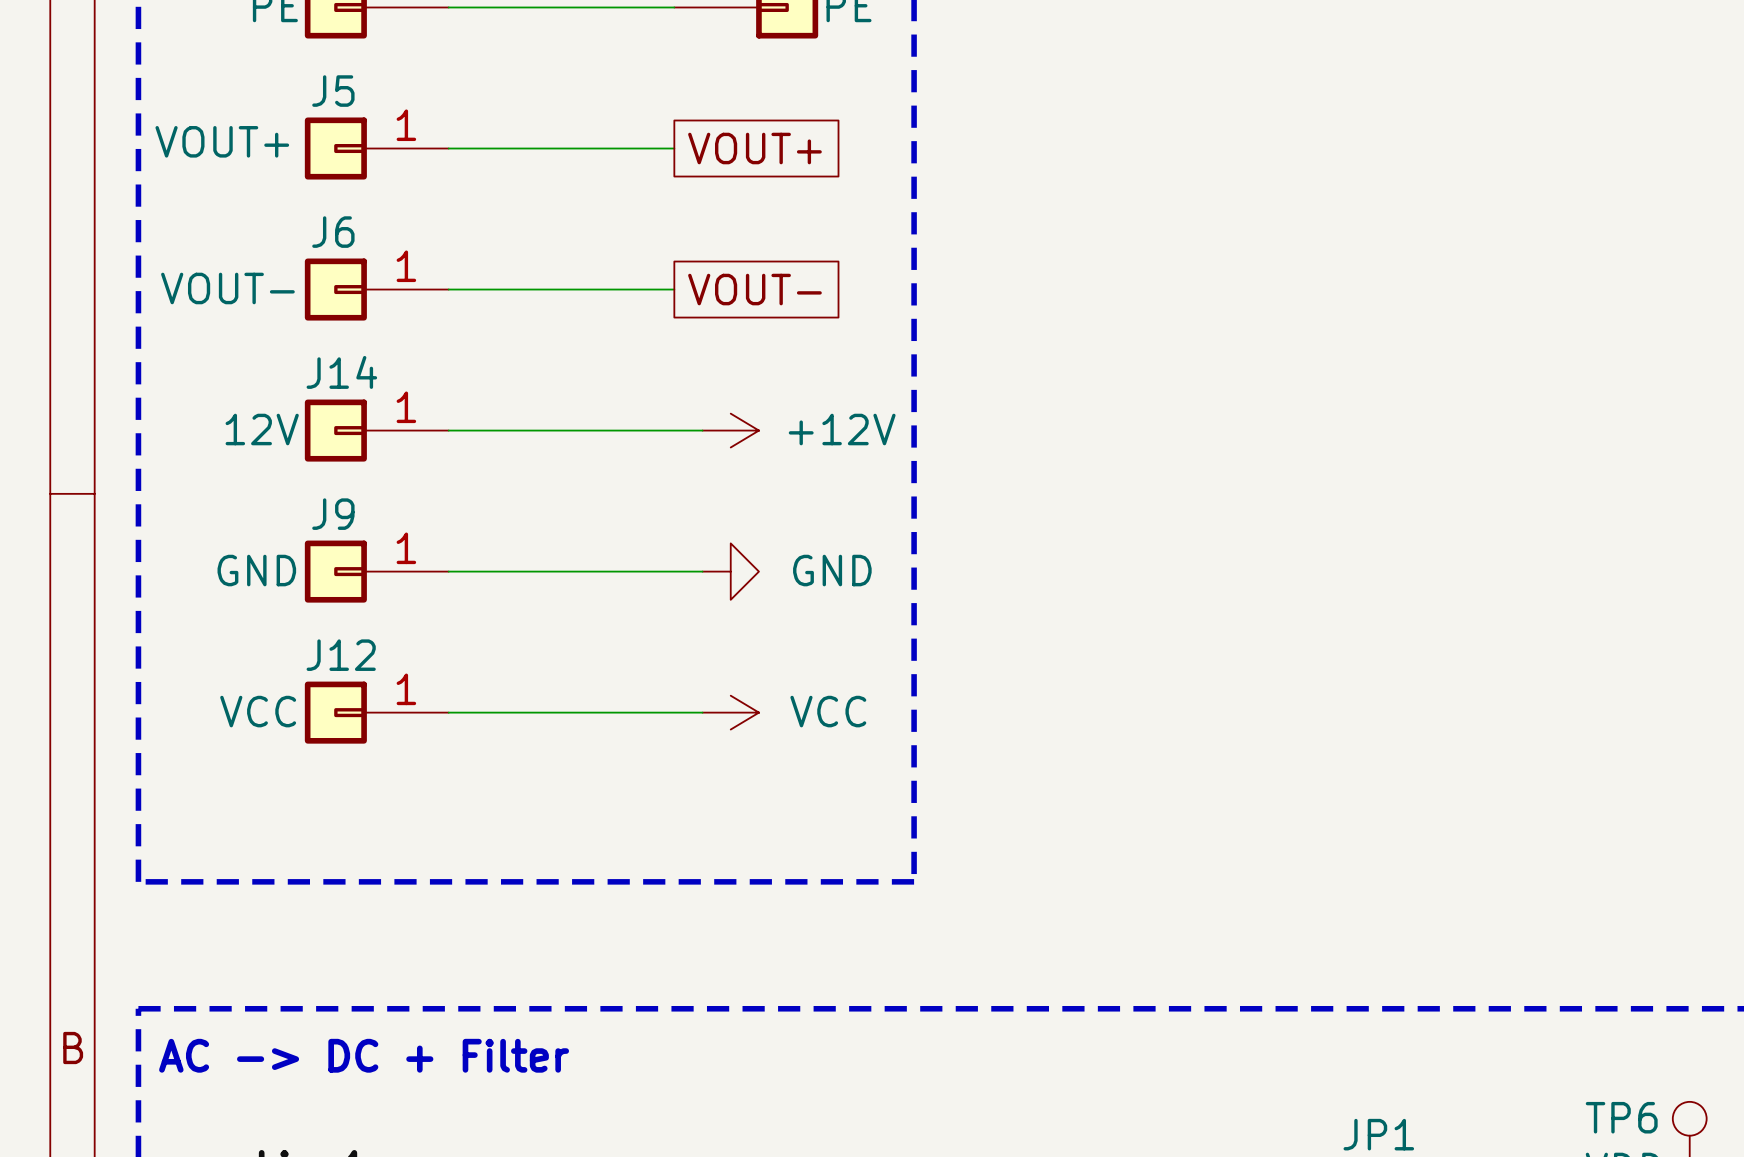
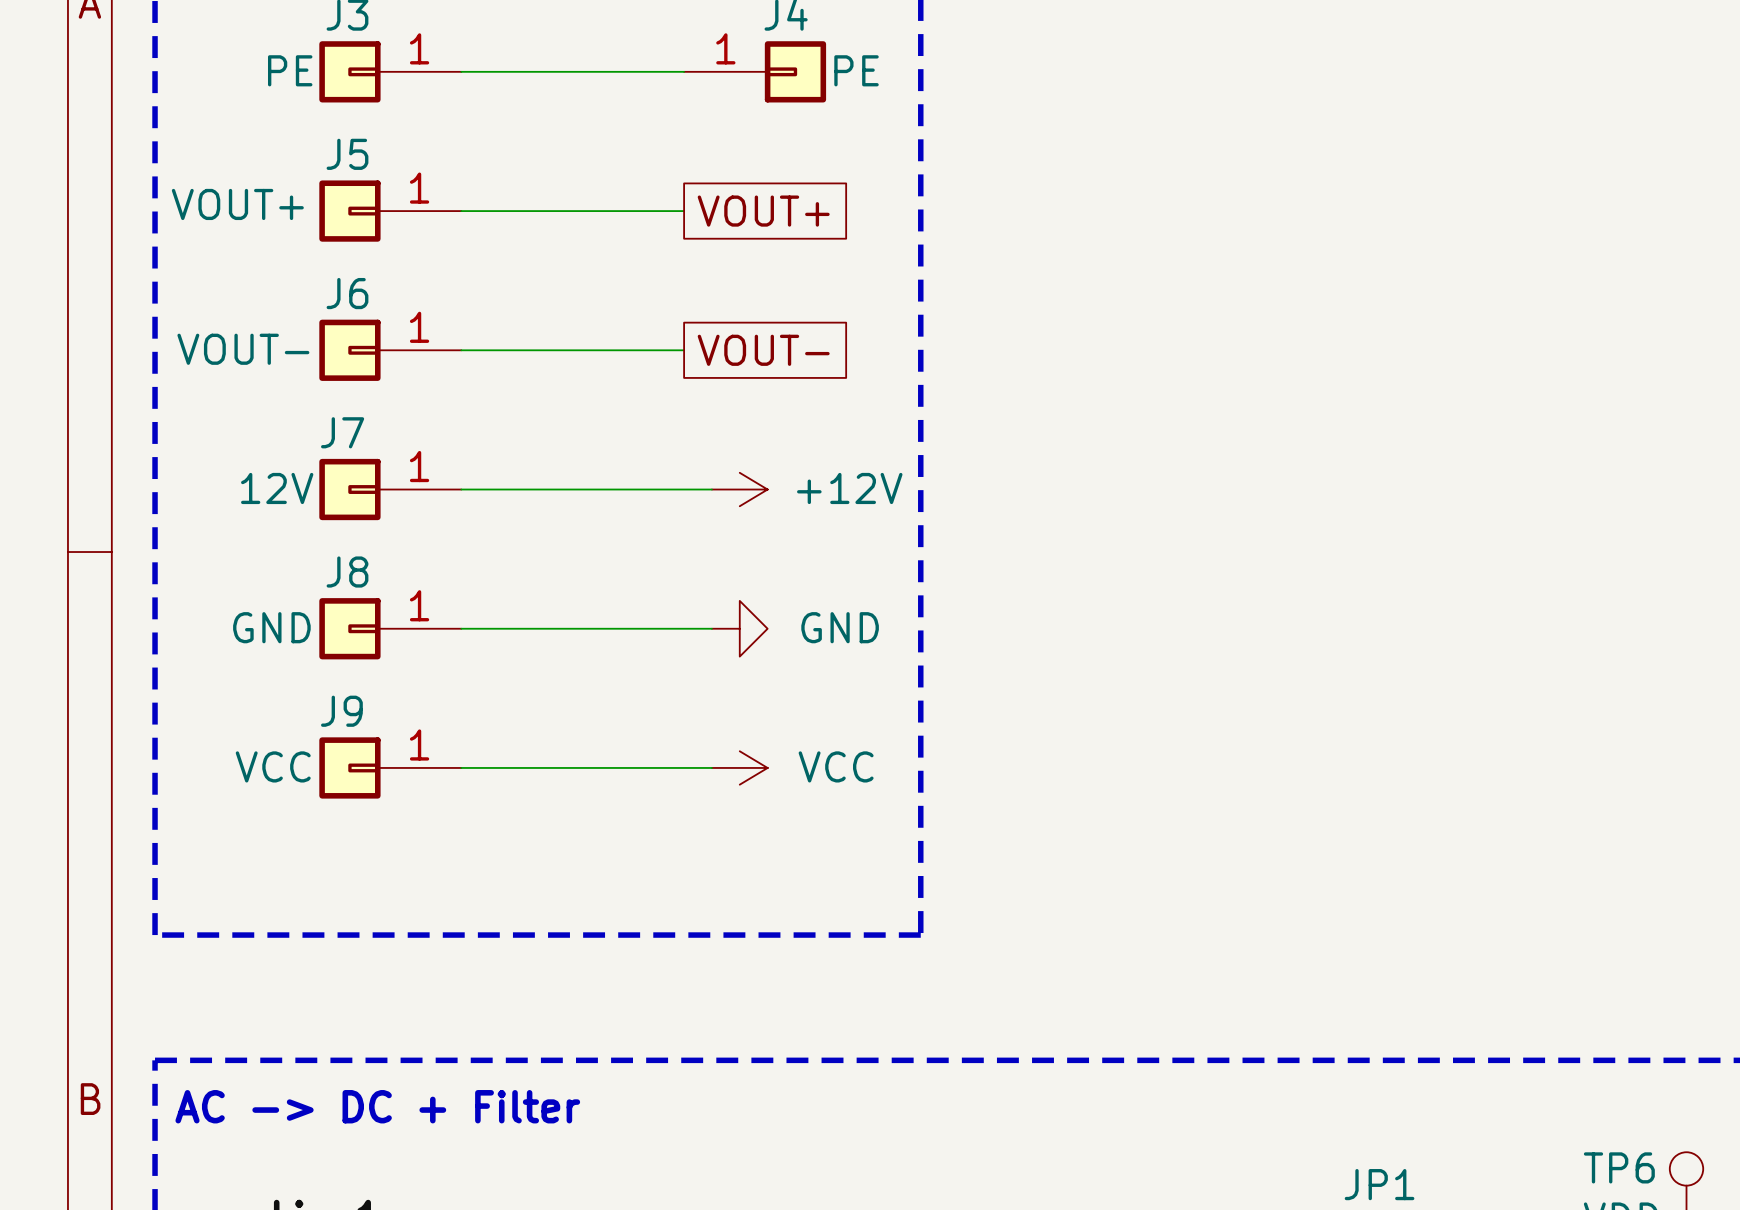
J14 name: J14 (341, 372) -> J7 (342, 432)
J9 name: J9 (333, 514) -> J8 (347, 572)
J12 name: J12 (341, 655) -> J9 (341, 711)

